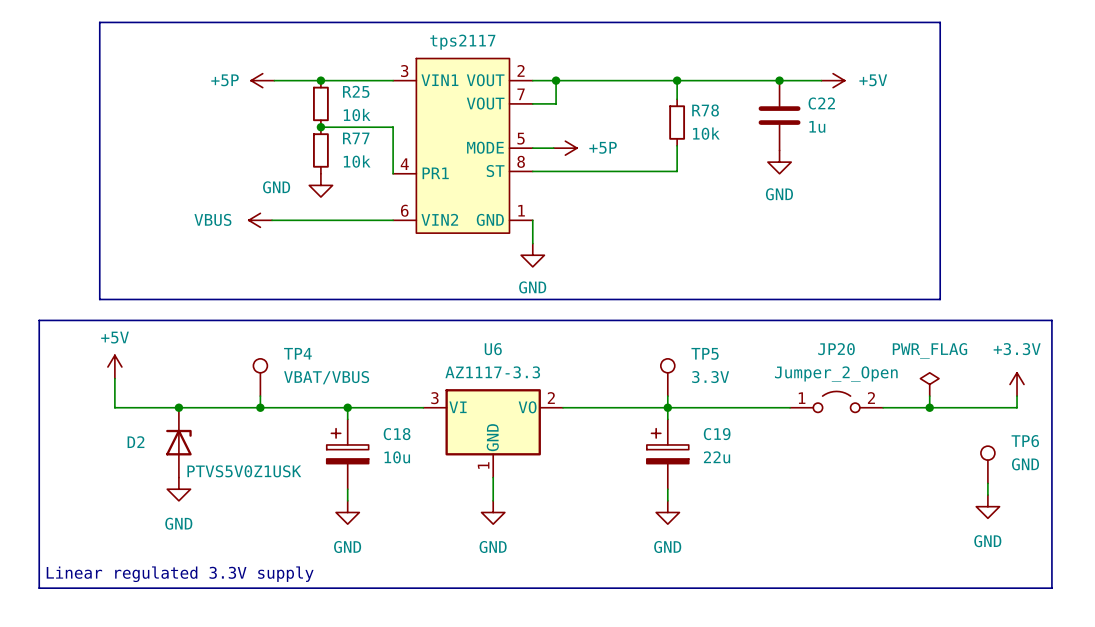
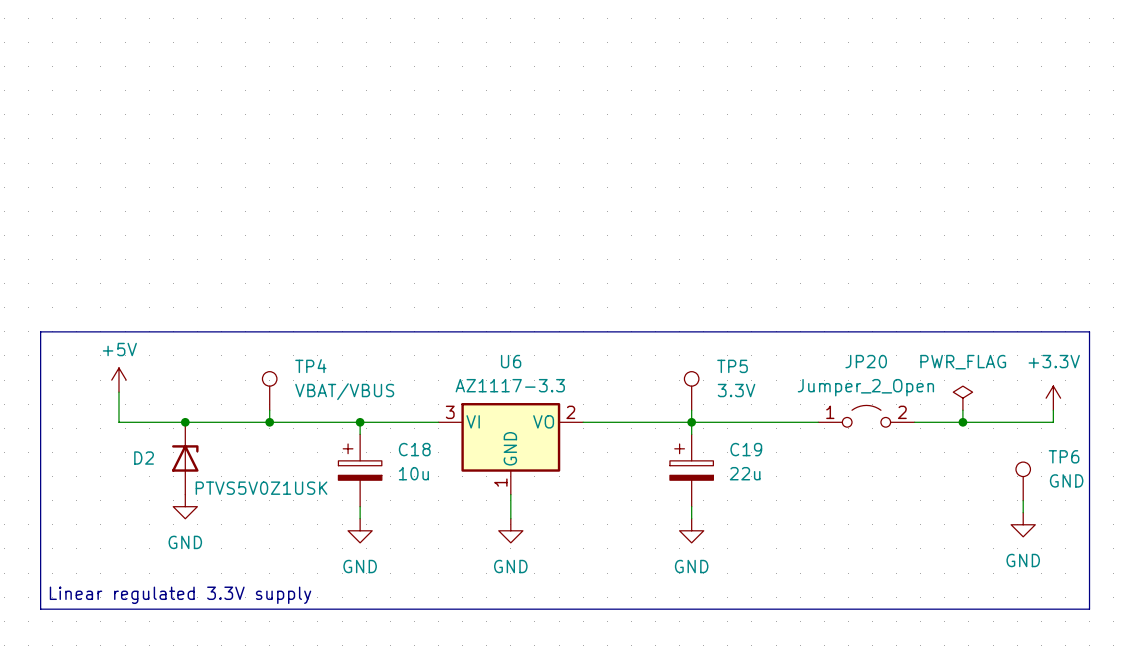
line: (99, 22) (940, 22) (940, 299) (99, 299) (99, 22) -> none
power symbol: +5P (262, 80) -> none
wire: (274, 80) (393, 80) -> none
junction: (320, 80) -> none
wire: (532, 80) (821, 80) -> none
wire: (556, 80) (556, 103) (532, 103) -> none
junction: (556, 80) -> none
wire: (677, 80) (677, 99) -> none
junction: (677, 80) -> none
junction: (779, 80) -> none
power symbol: +5V (833, 80) -> none
R25: 10k (320, 103) -> none
C22: 1u (779, 115) -> none
R78: 10k (677, 122) -> none
wire: (320, 127) (393, 127) (393, 173) -> none
junction: (320, 127) -> none
part: tps2117 (462, 145) -> none
wire: (677, 145) (677, 171) (532, 171) -> none
wire: (532, 148) (553, 148) -> none
power symbol: +5P (565, 148) -> none
R77: 10k (320, 150) -> none
power symbol: GND (779, 162) -> none
power symbol: GND (320, 185) -> none
power symbol: VBUS (260, 220) -> none
wire: (272, 220) (393, 220) -> none
wire: (532, 220) (532, 243) -> none
power symbol: GND (532, 255) -> none

